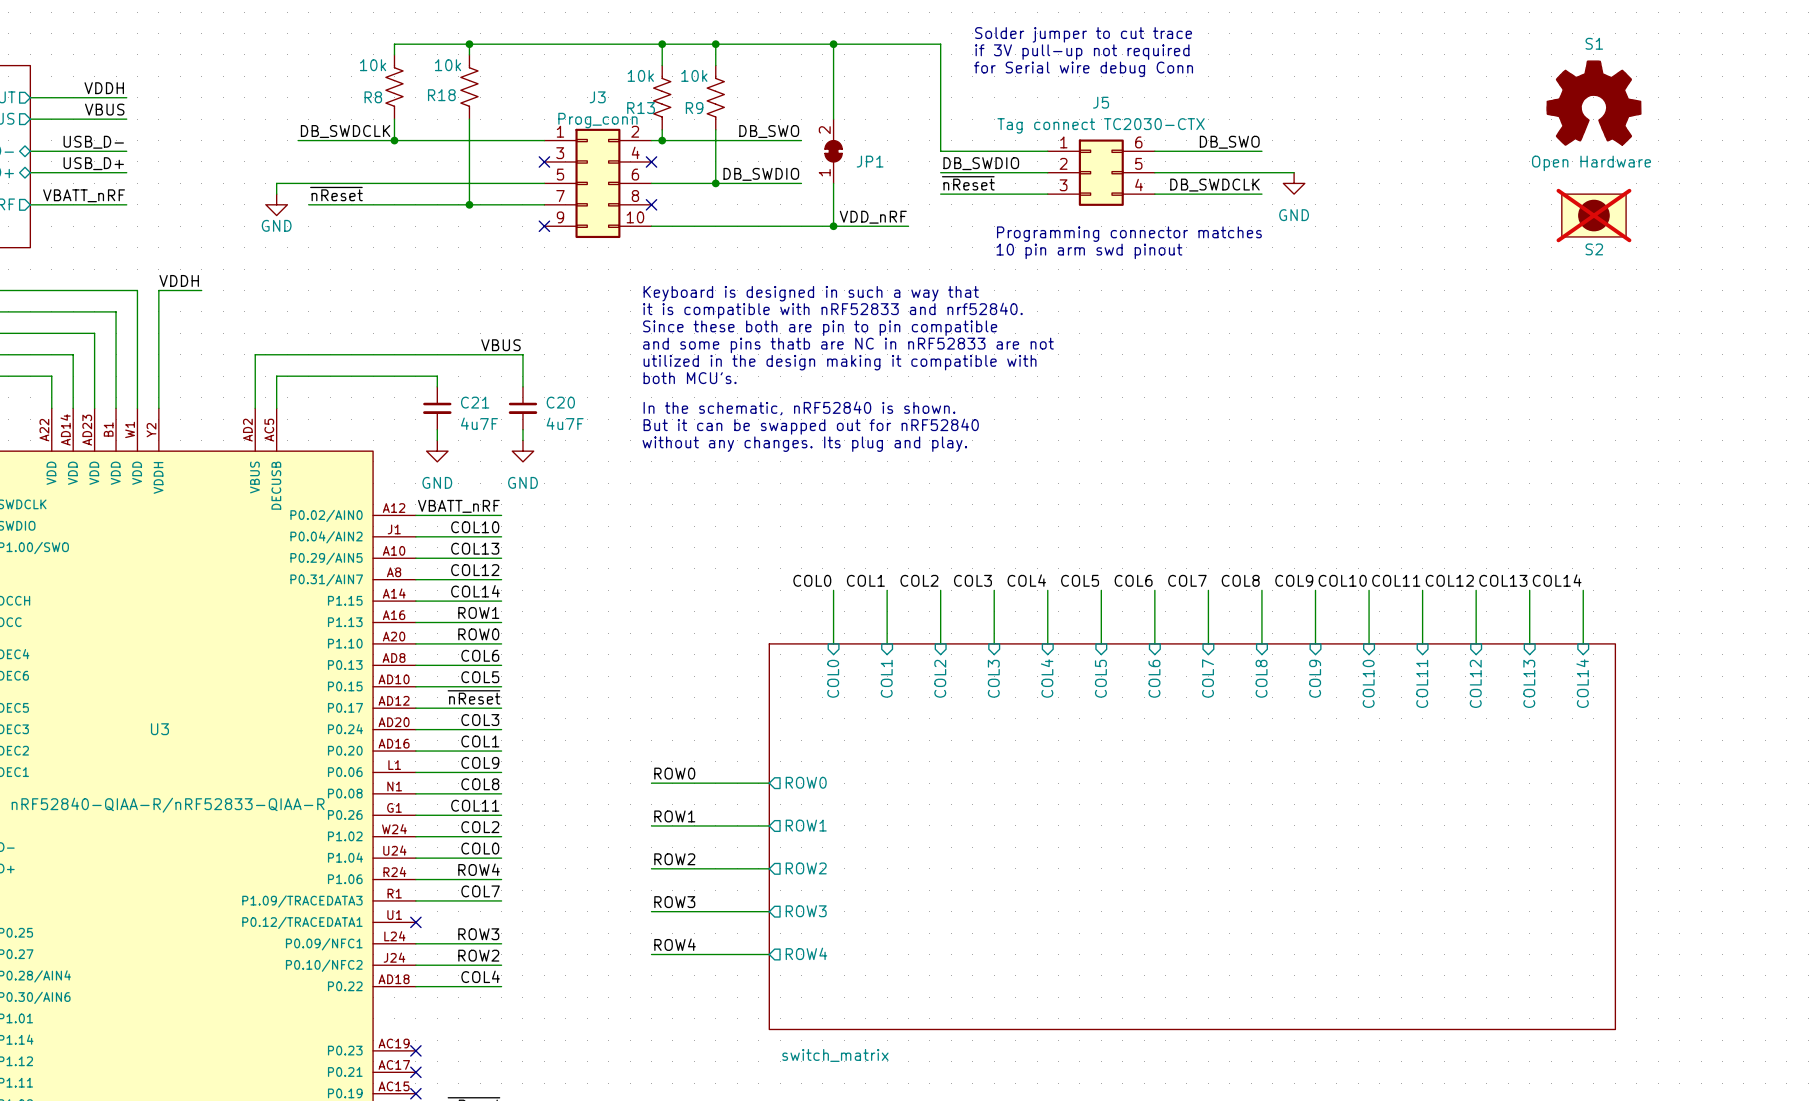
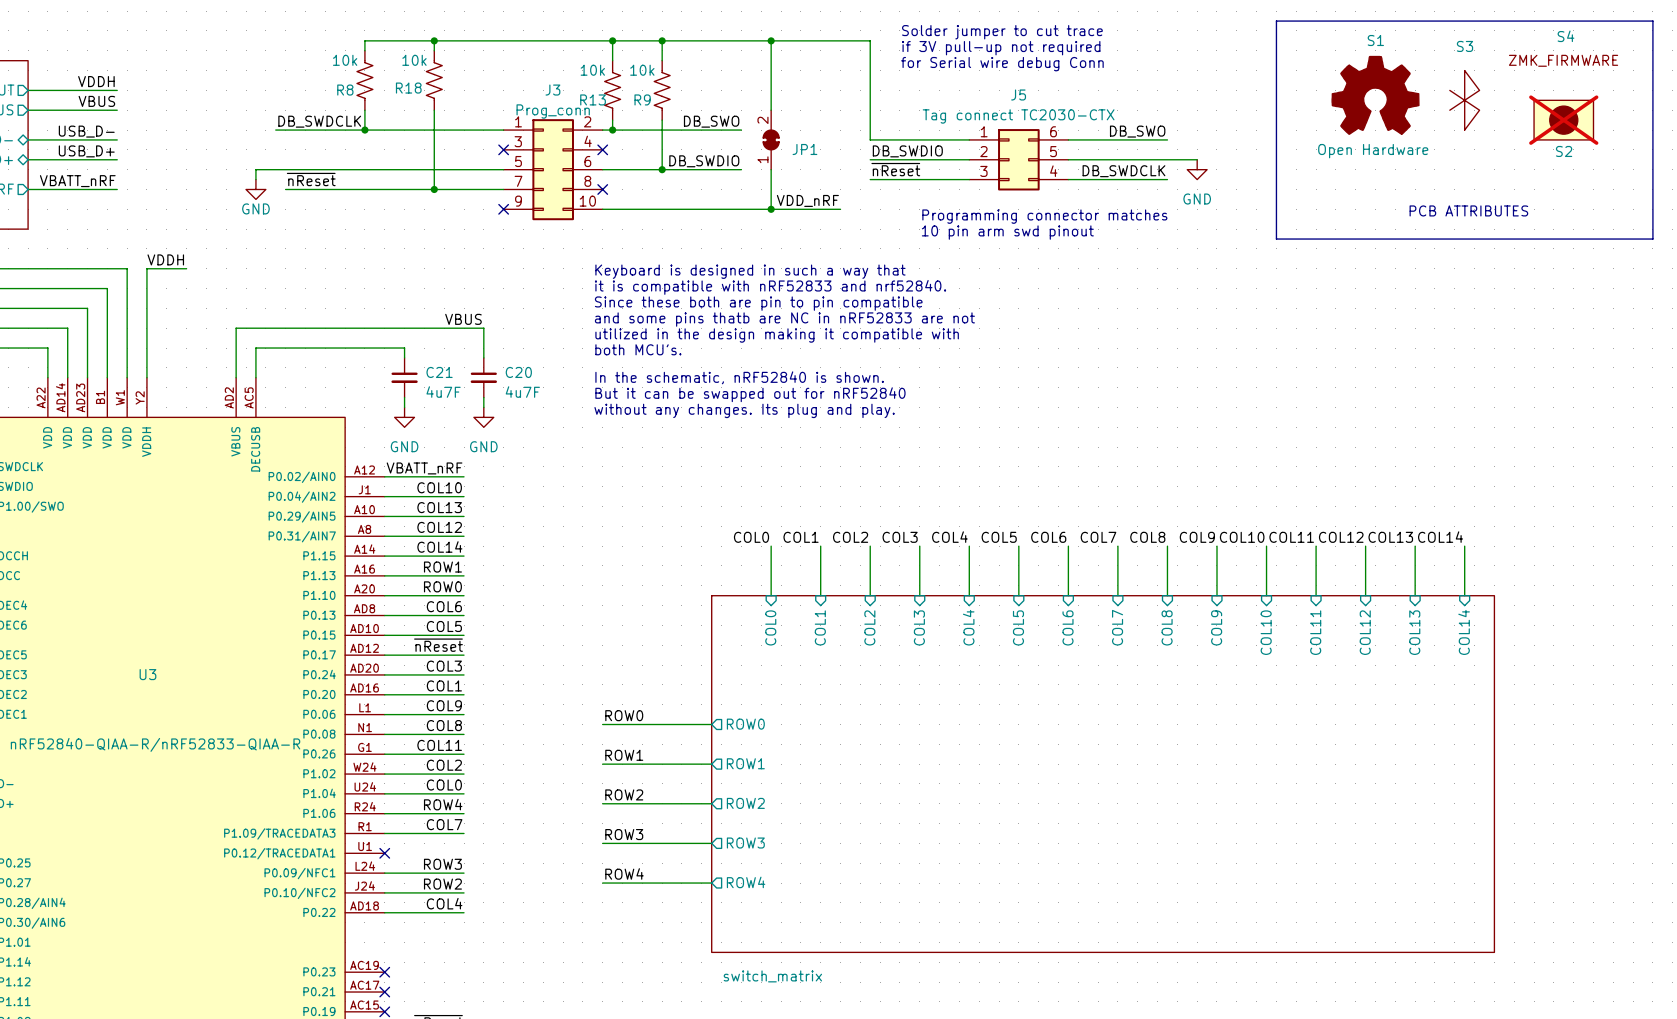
bus: none -> (1276, 21) (1276, 239) (1652, 239) (1652, 21) (1276, 21)
S4: none -> (1563, 48)
S1 position: (1593, 103) -> (1375, 95)
S3: none -> (1464, 100)
S2 position: (1593, 215) -> (1563, 120)
text: none -> PCB ATTRIBUTES (1468, 210)

